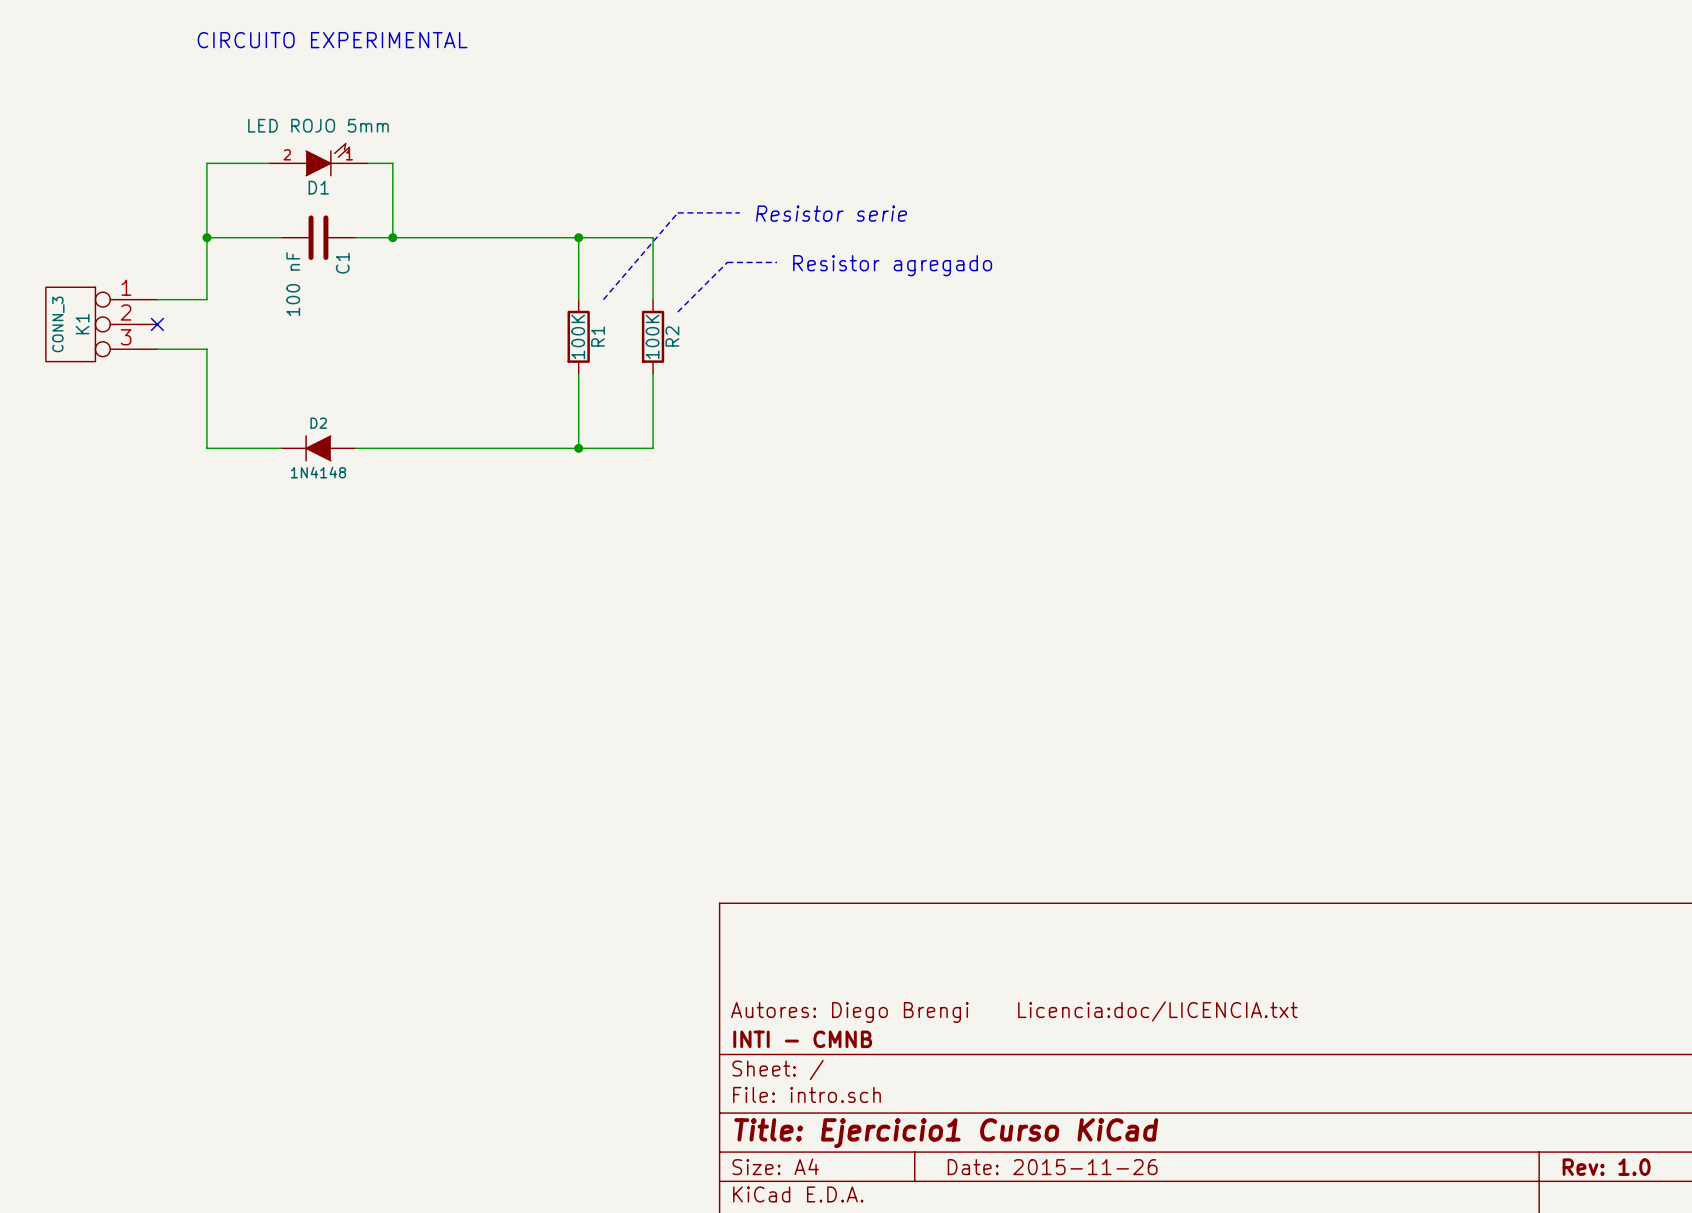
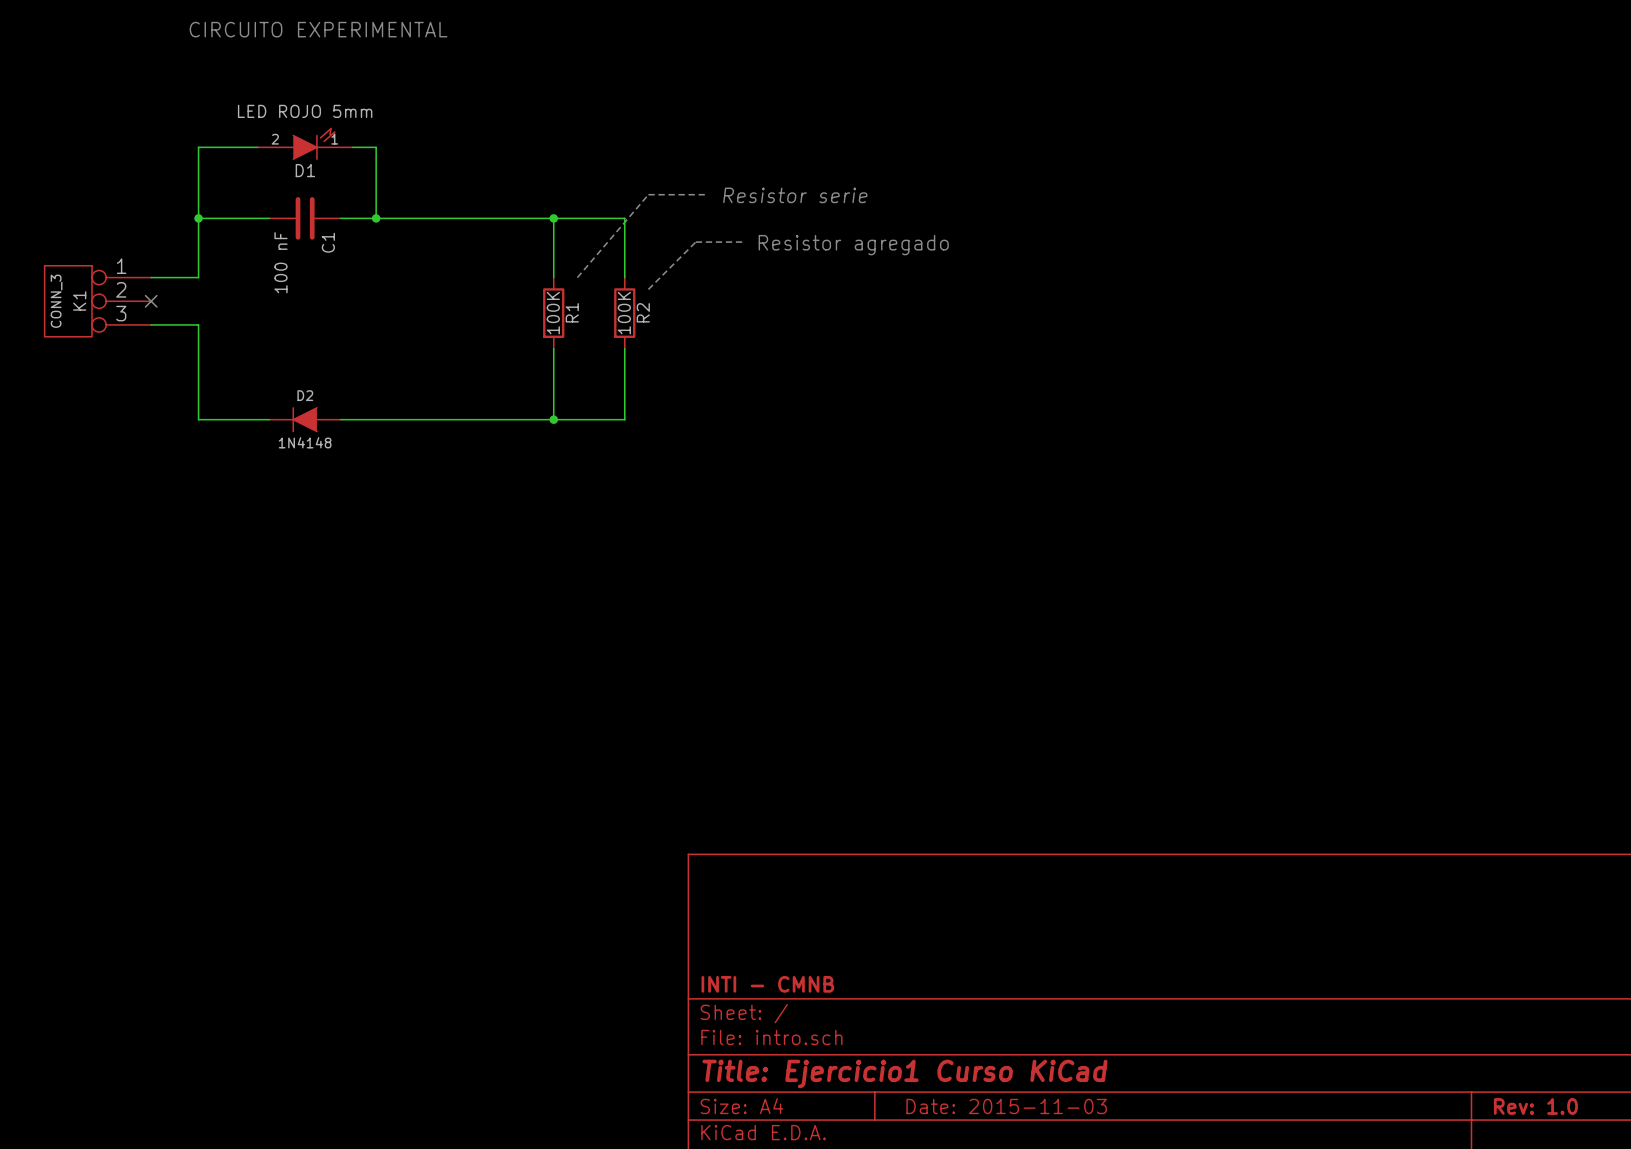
title block: Autores: Diego Brengi Licencia:doc/LICENCIA.txt (1014, 1012) -> none
title block: Date: 2015-11-26 (1052, 1167) -> Date: 2015-11-03 (1006, 1106)

